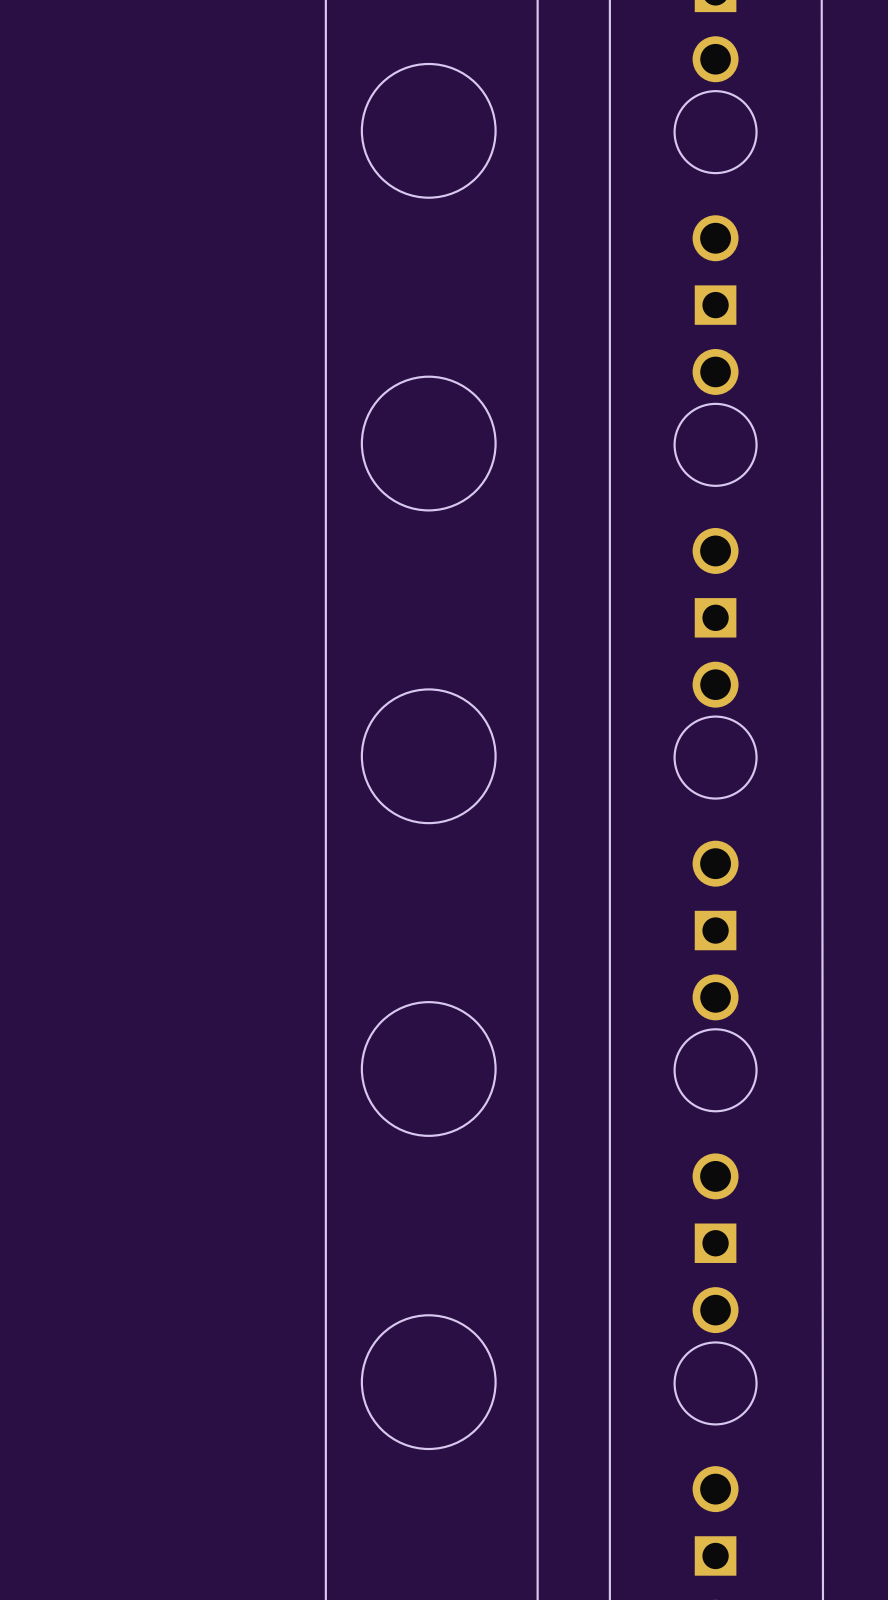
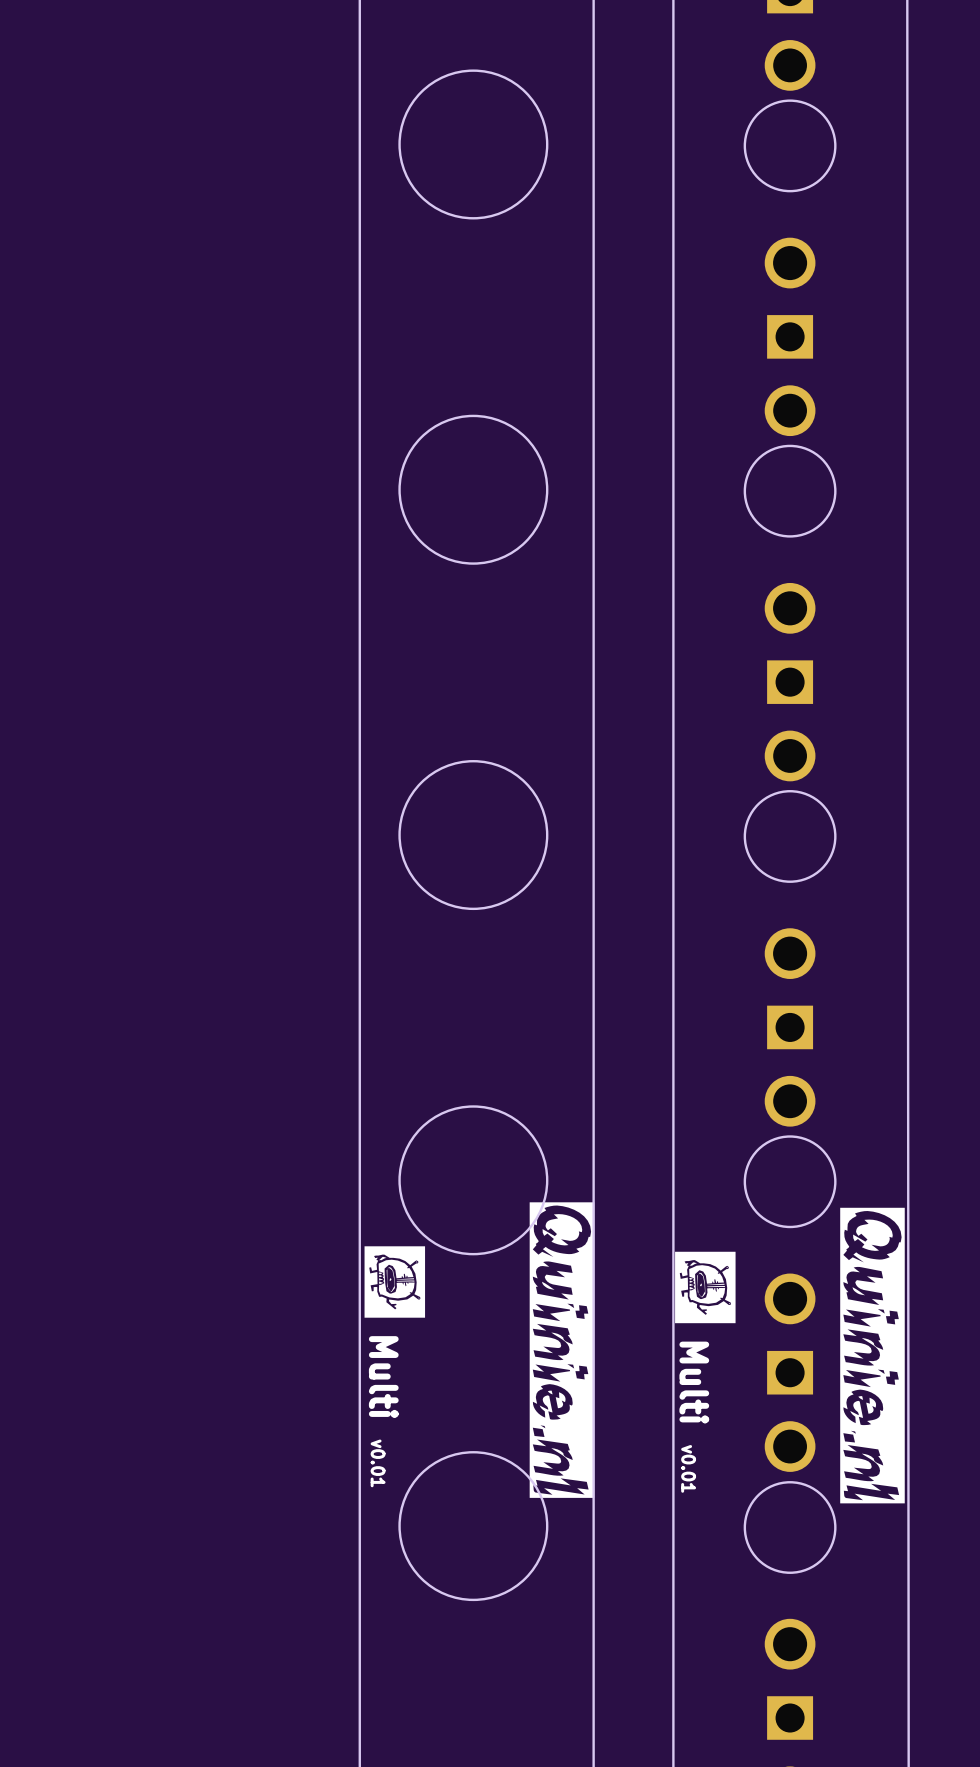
drawing: none -> [529, 1202, 595, 1498]
drawing: none -> [840, 1207, 905, 1504]
drawing: none -> [364, 1246, 426, 1318]
drawing: none -> [675, 1251, 736, 1324]
text: none -> Multi (383, 1377)
text: none -> Multi (694, 1382)
text: none -> v0.01 (378, 1463)
text: none -> v0.01 (688, 1468)

